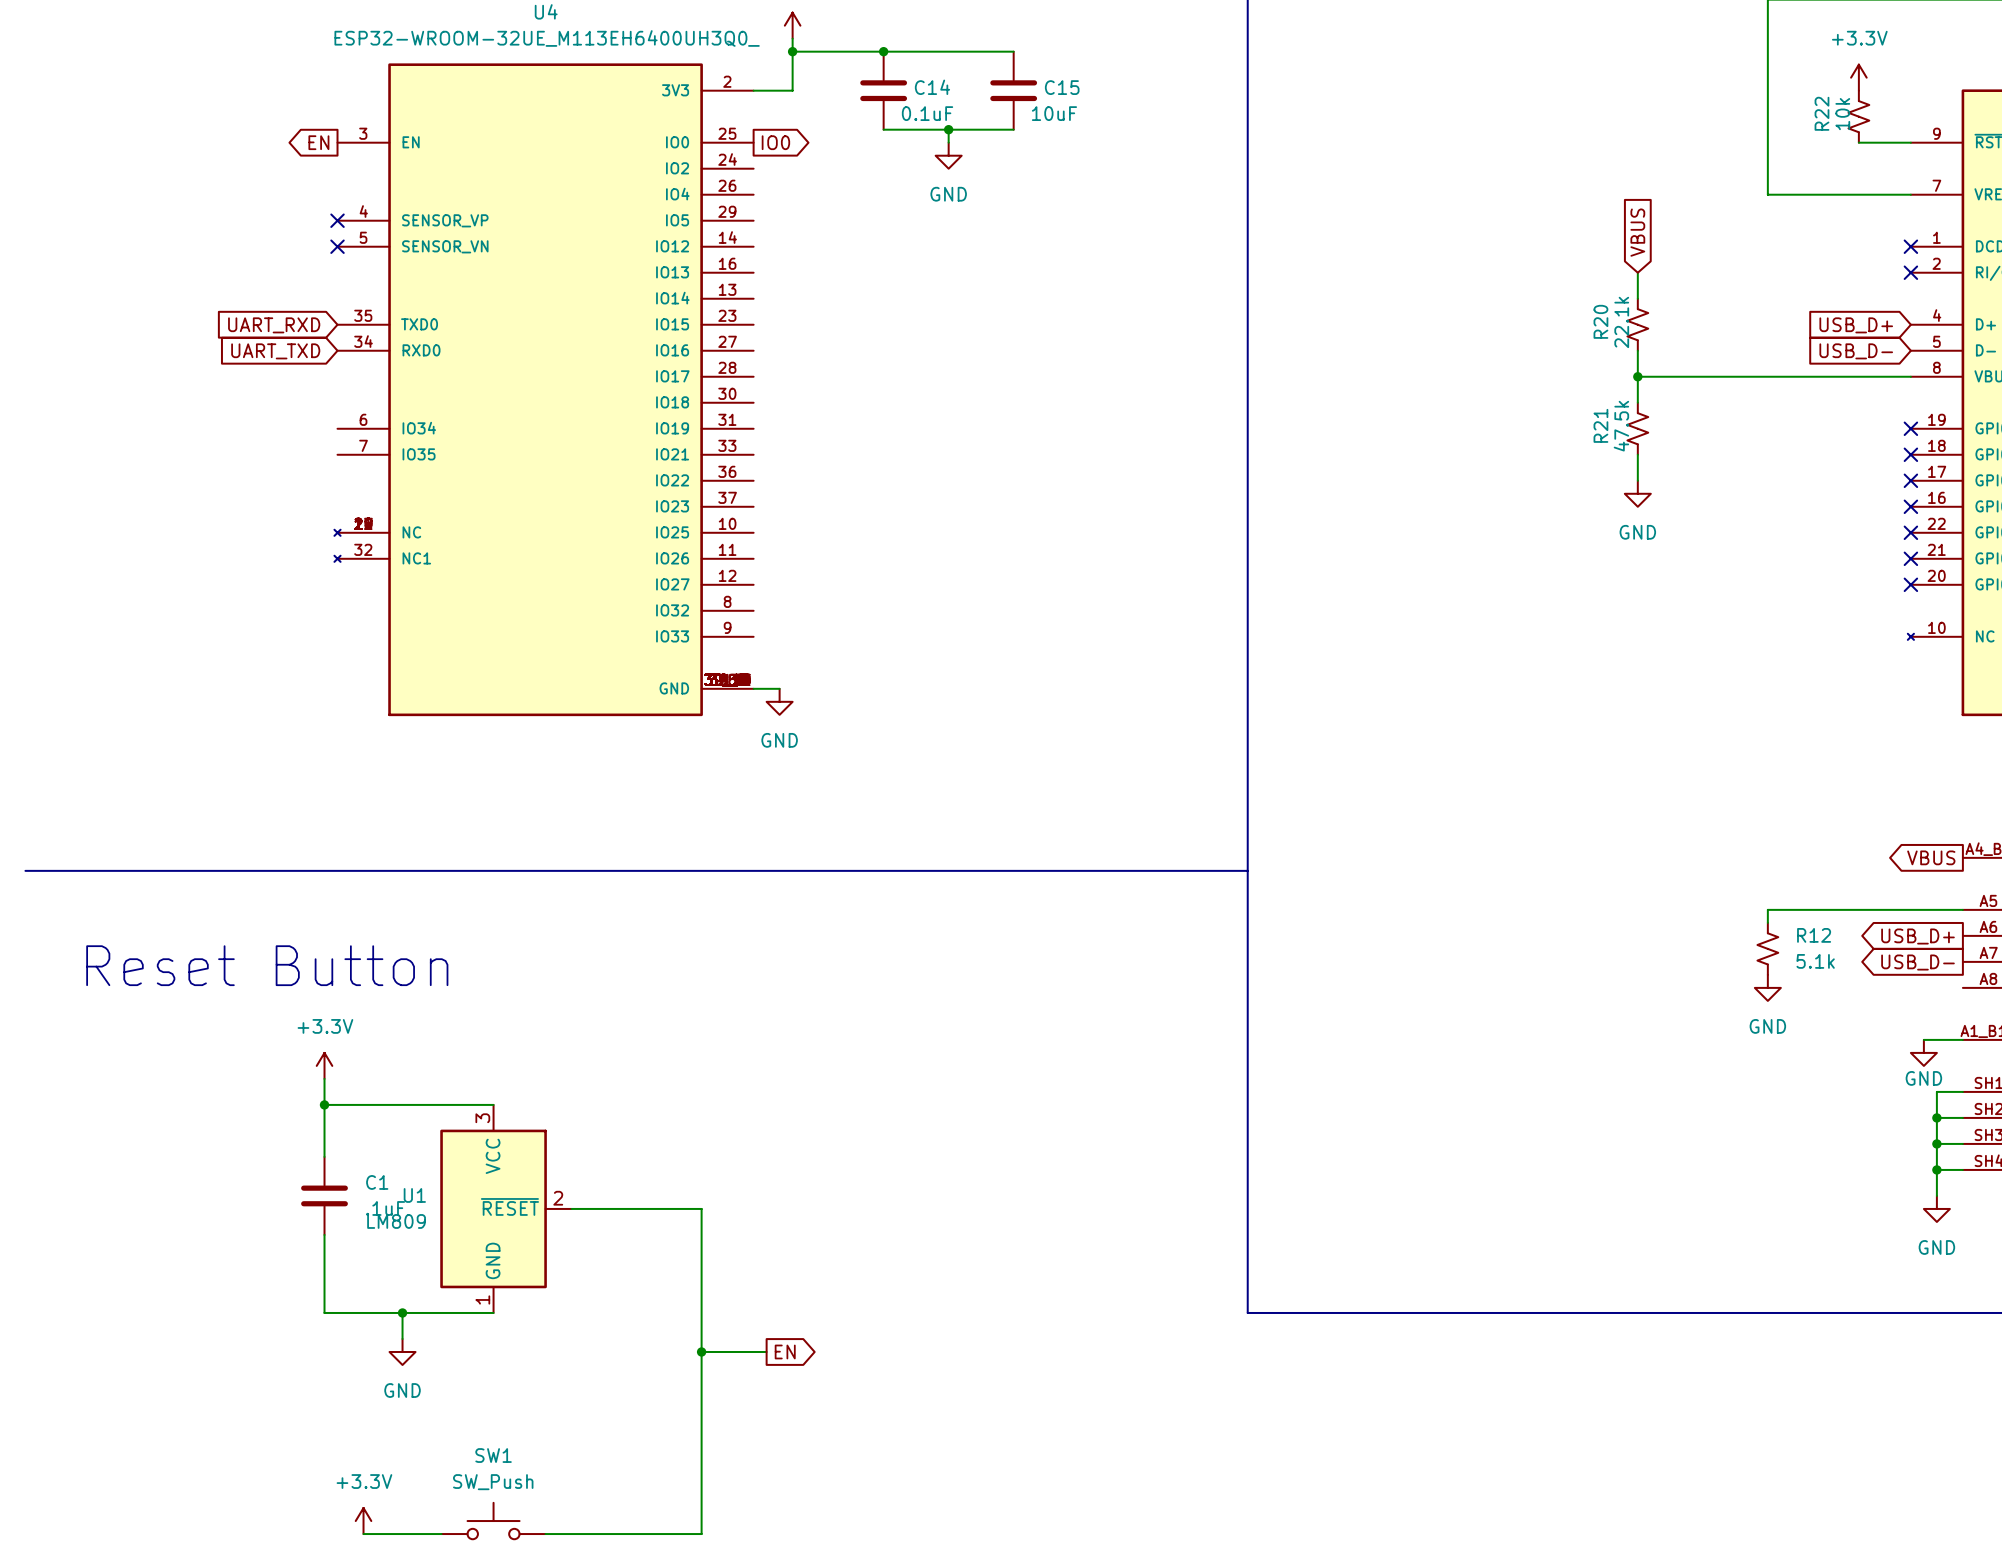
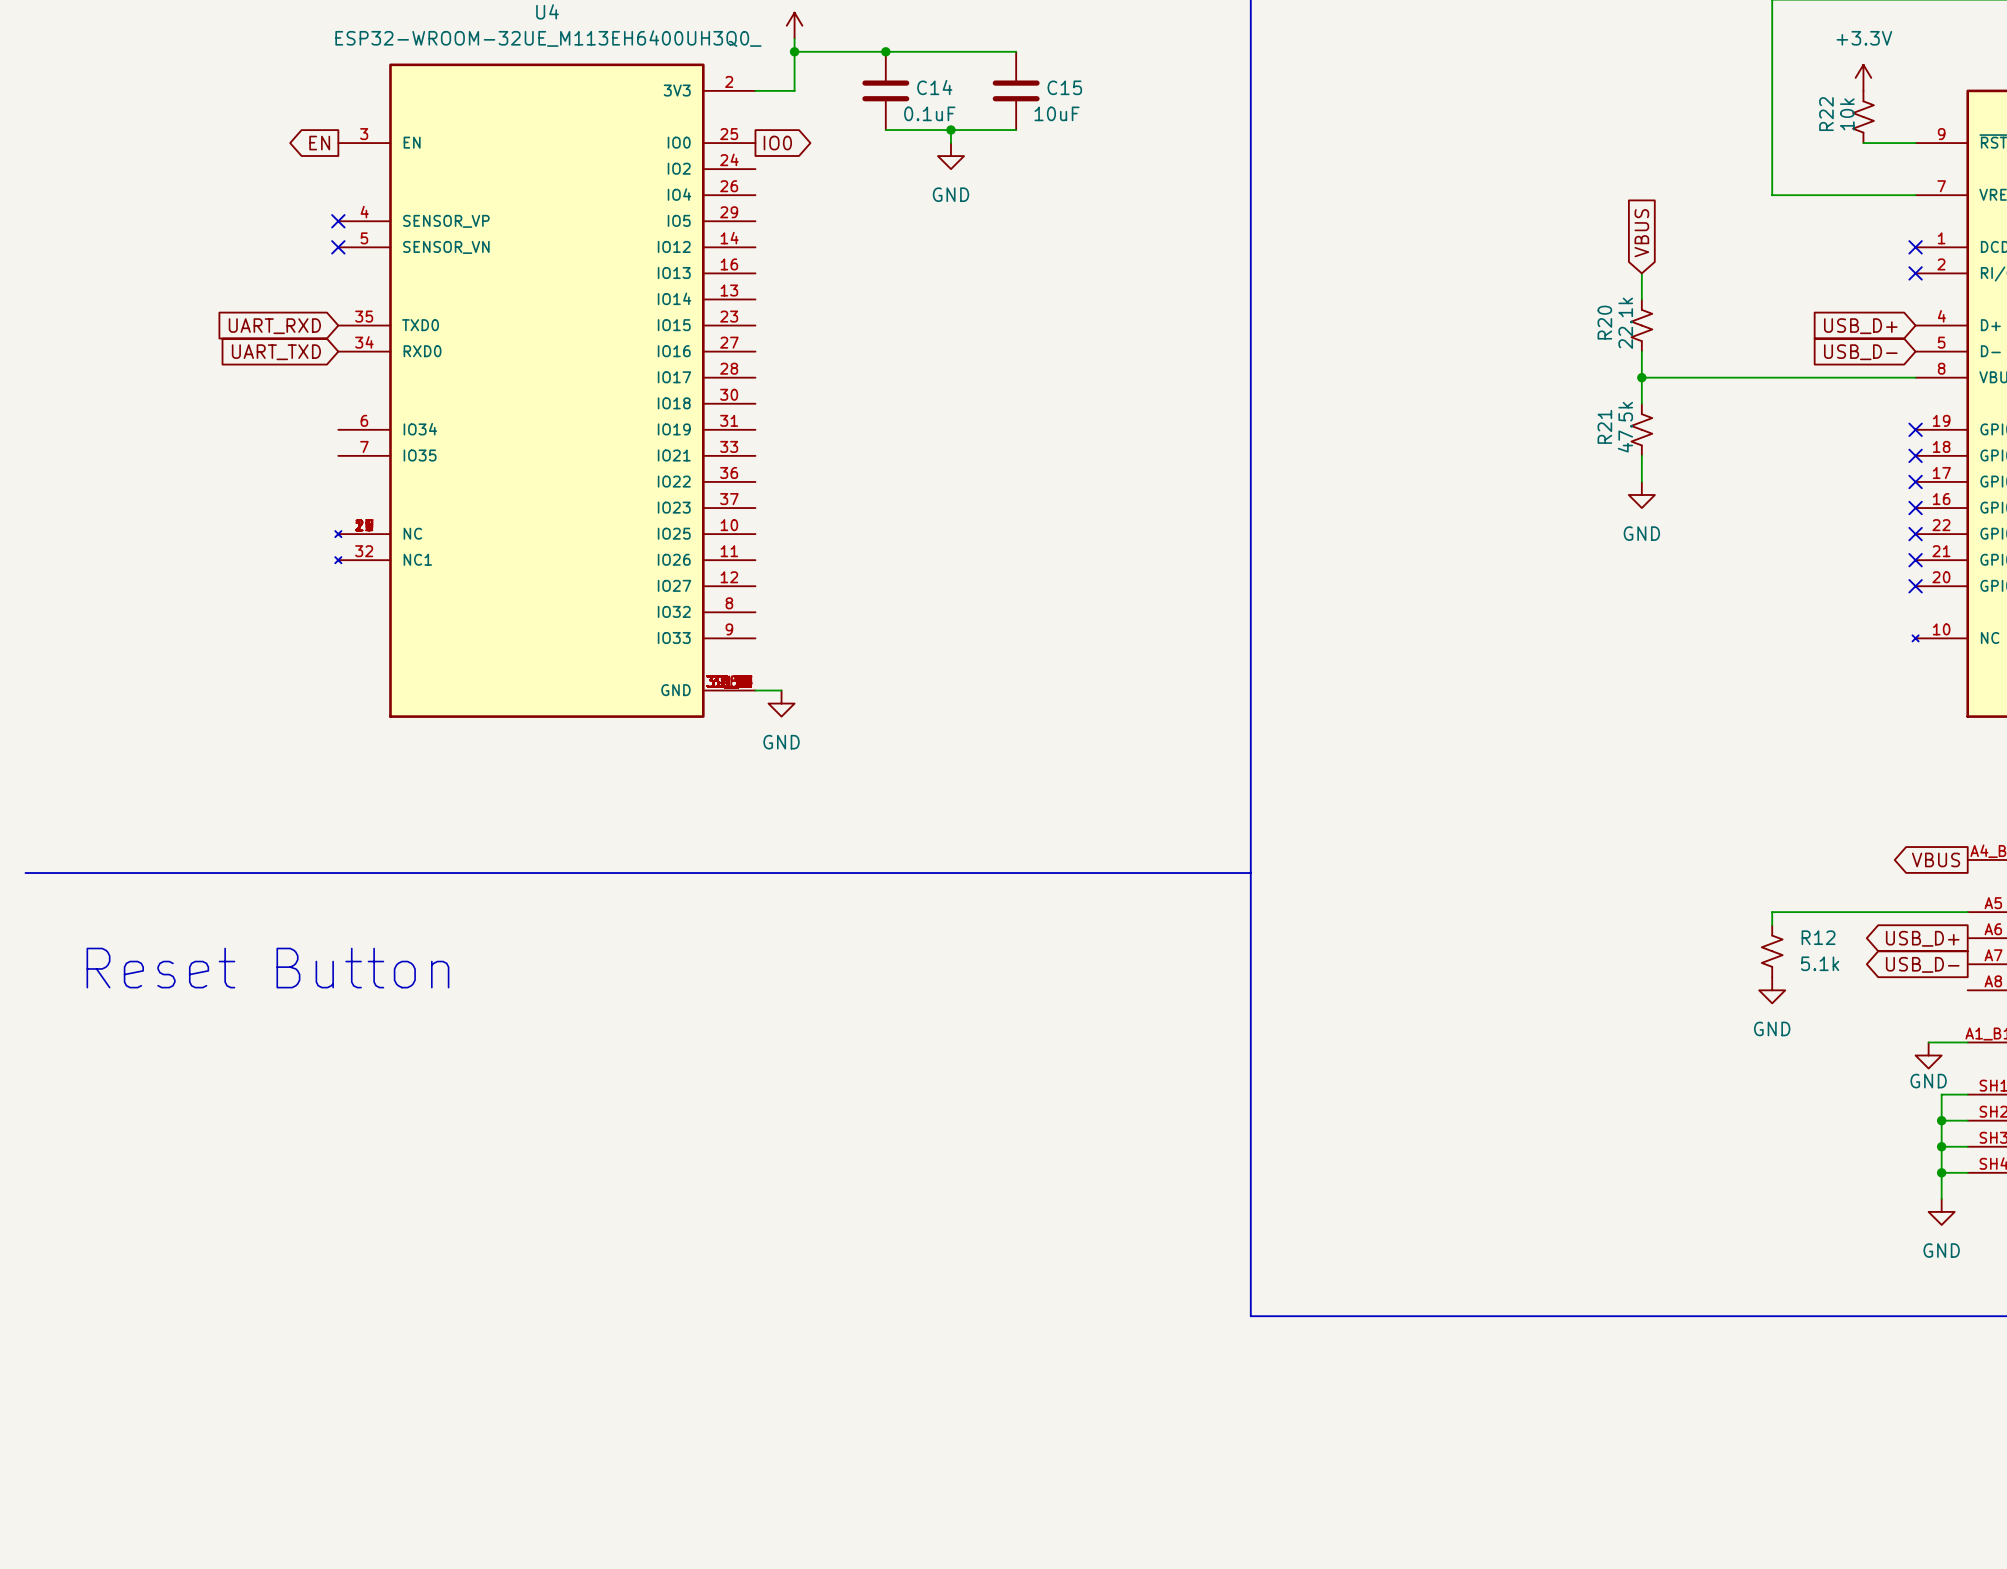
power symbol: +3.3V (324, 1065) -> none
wire: (324, 1078) (324, 1156) -> none
wire: (324, 1104) (493, 1104) -> none
junction: (324, 1104) -> none
C1: .1uF (324, 1195) -> none
U1: LM809 (505, 1208) -> none
wire: (571, 1208) (701, 1208) (701, 1534) (545, 1534) -> none
wire: (324, 1234) (324, 1312) (493, 1312) -> none
wire: (402, 1312) (402, 1338) -> none
junction: (402, 1312) -> none
power symbol: GND (402, 1351) -> none
wire: (701, 1351) (766, 1351) -> none
junction: (701, 1351) -> none
global label: EN (785, 1351) -> none
power symbol: +3.3V (363, 1521) -> none
SW1: SW_Push (493, 1521) -> none
wire: (363, 1534) (441, 1534) -> none

